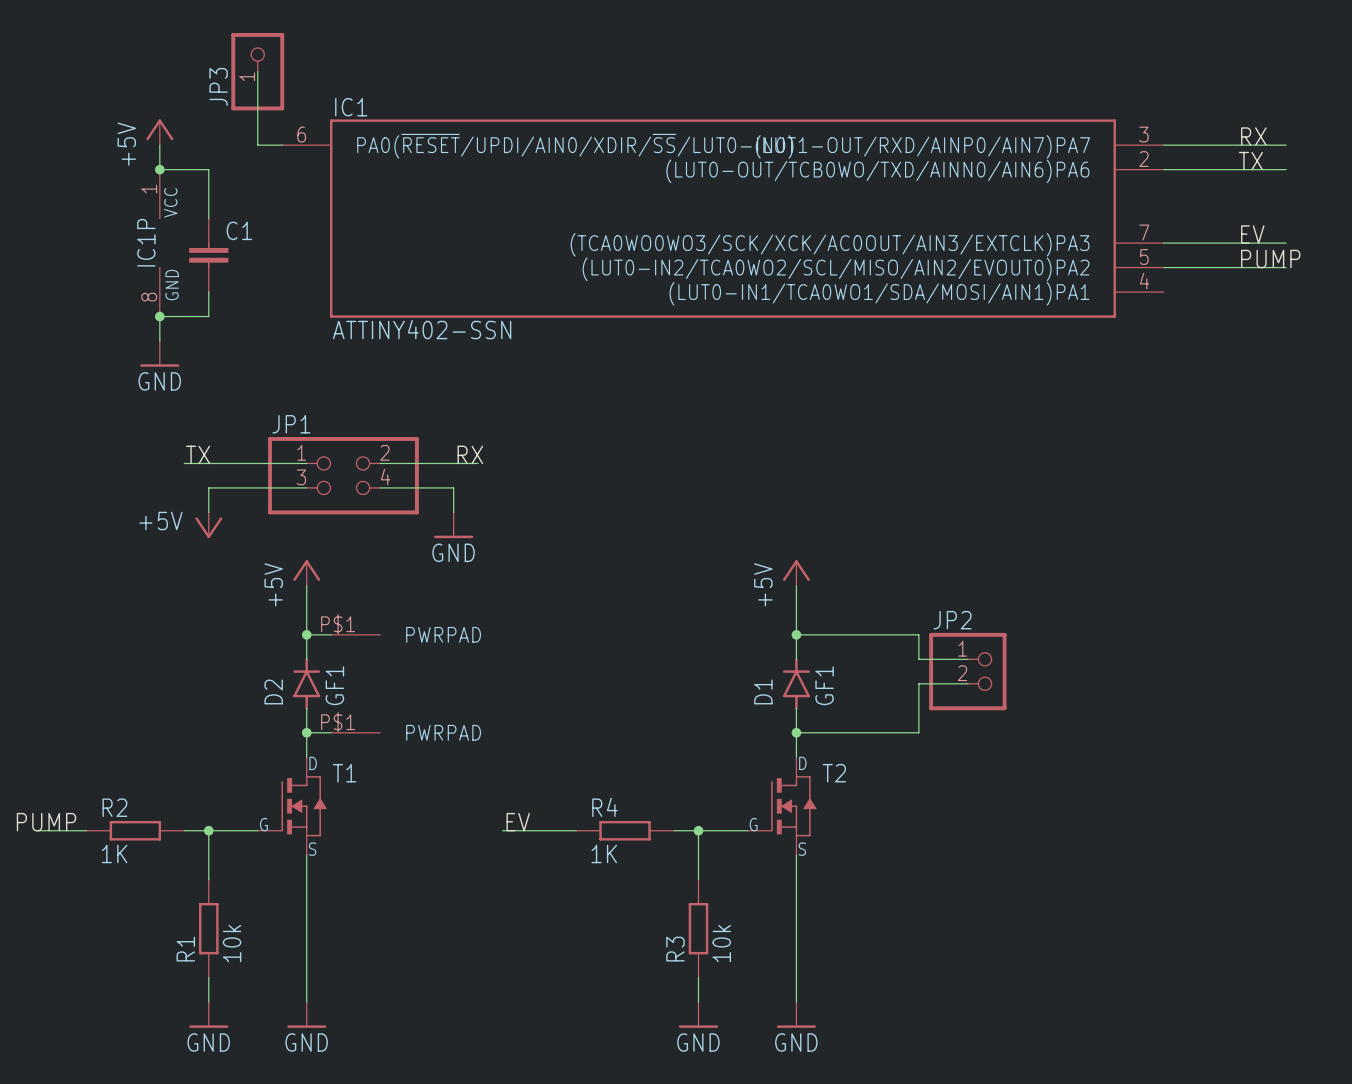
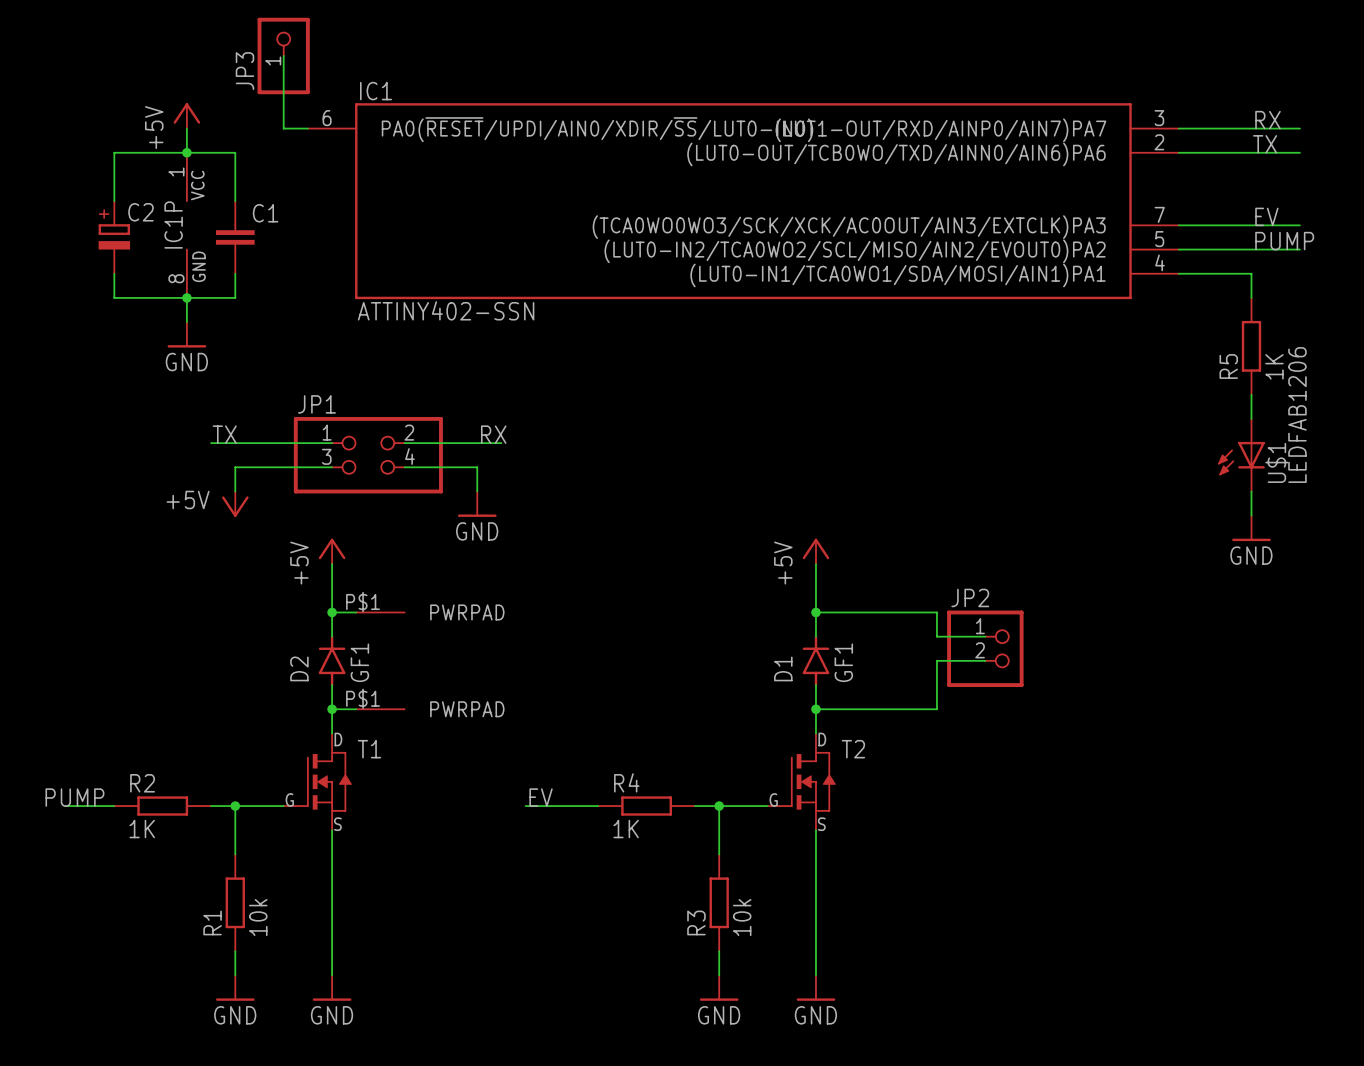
wire: none -> (186, 152) (114, 152) (114, 201)
C2: none -> (114, 237)
wire: none -> (114, 273) (114, 297) (186, 297)
wire: none -> (1178, 273) (1251, 273) (1251, 297)
R5: none -> 1K (1251, 346)
wire: none -> (1251, 394) (1251, 418)
U$1: none -> LEDFAB1206 (1241, 455)
wire: none -> (1251, 491) (1251, 515)
power symbol: none -> GND (1251, 528)

